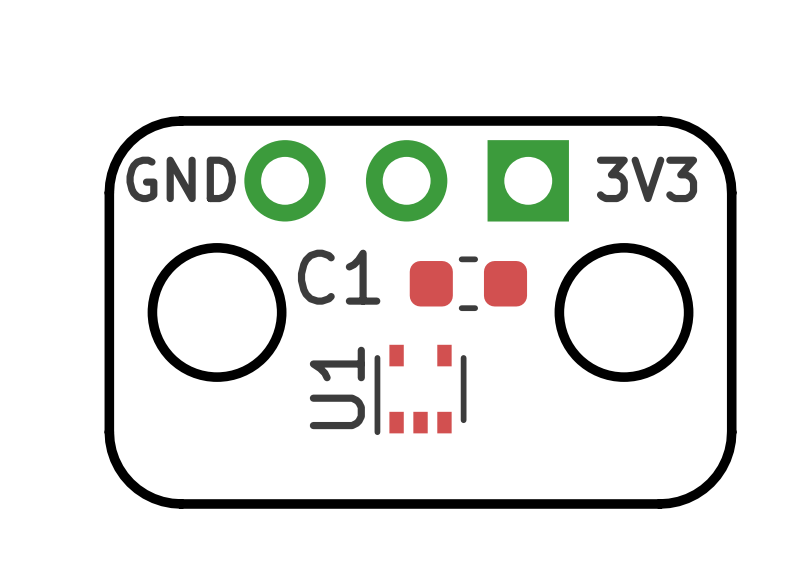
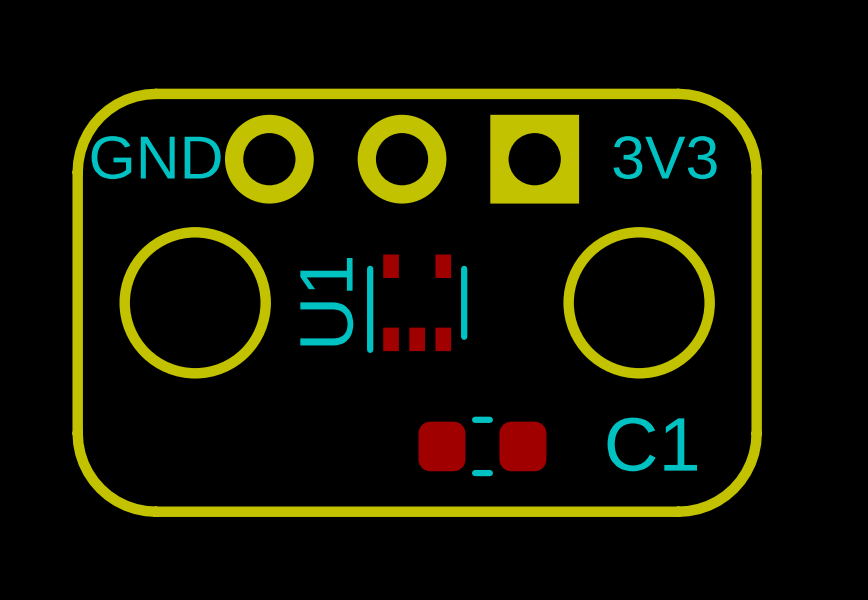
C1 name position: C1 (339, 277) -> C1 (652, 444)
C1 position: (468, 283) -> (482, 446)
U1 position: (420, 389) -> (417, 303)

